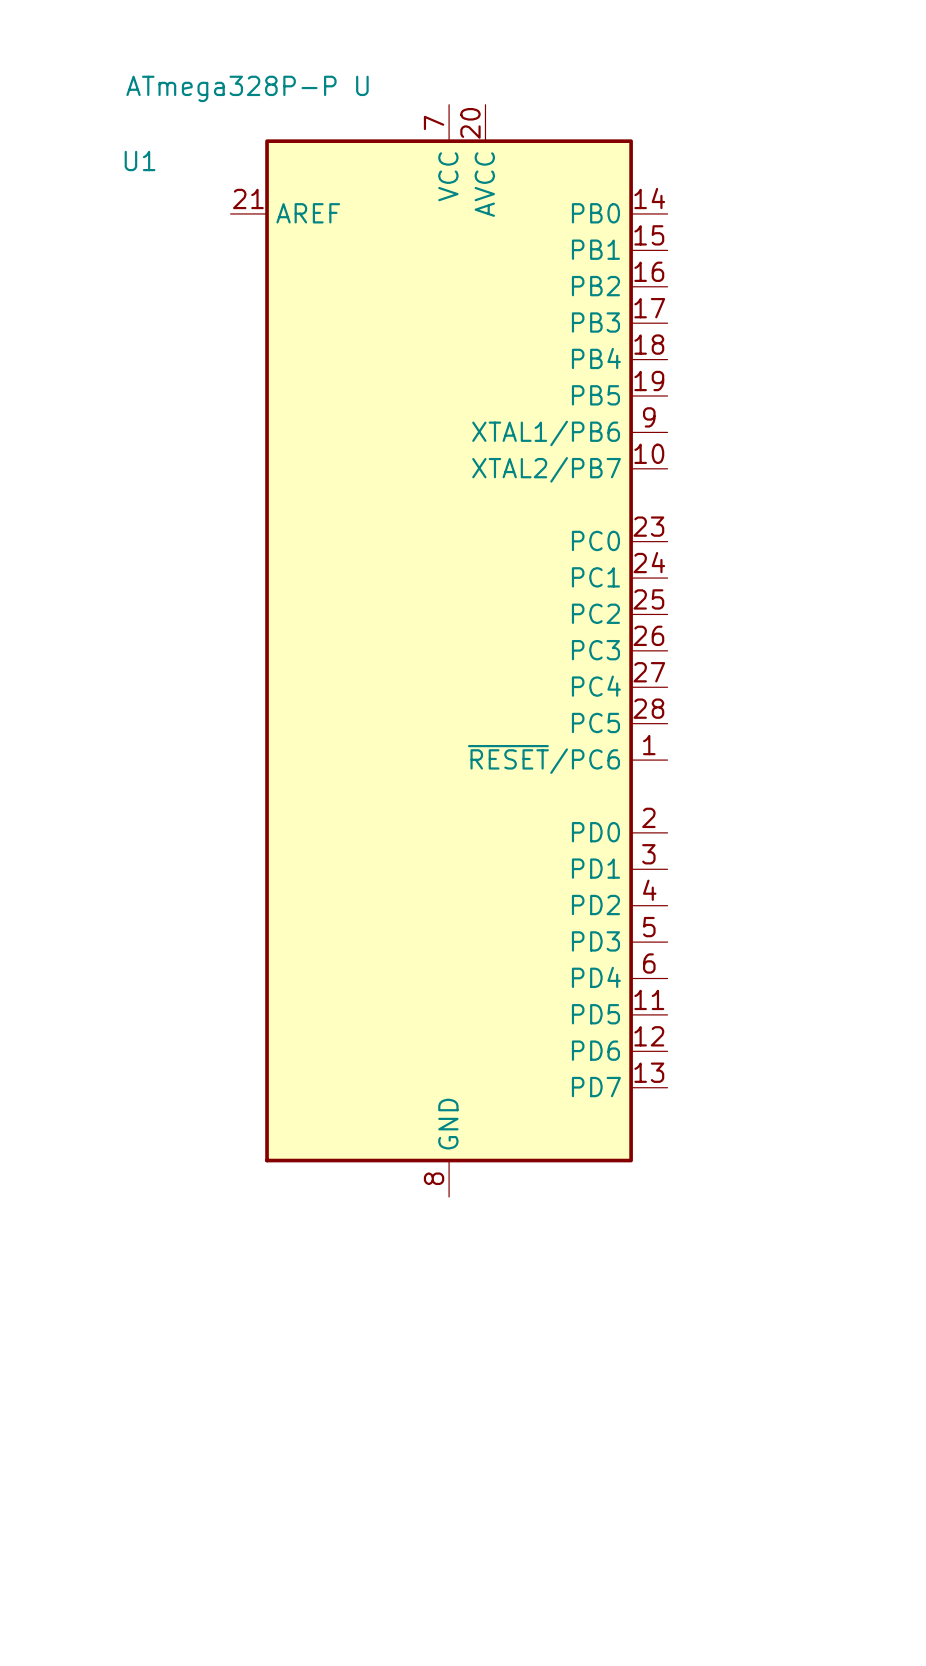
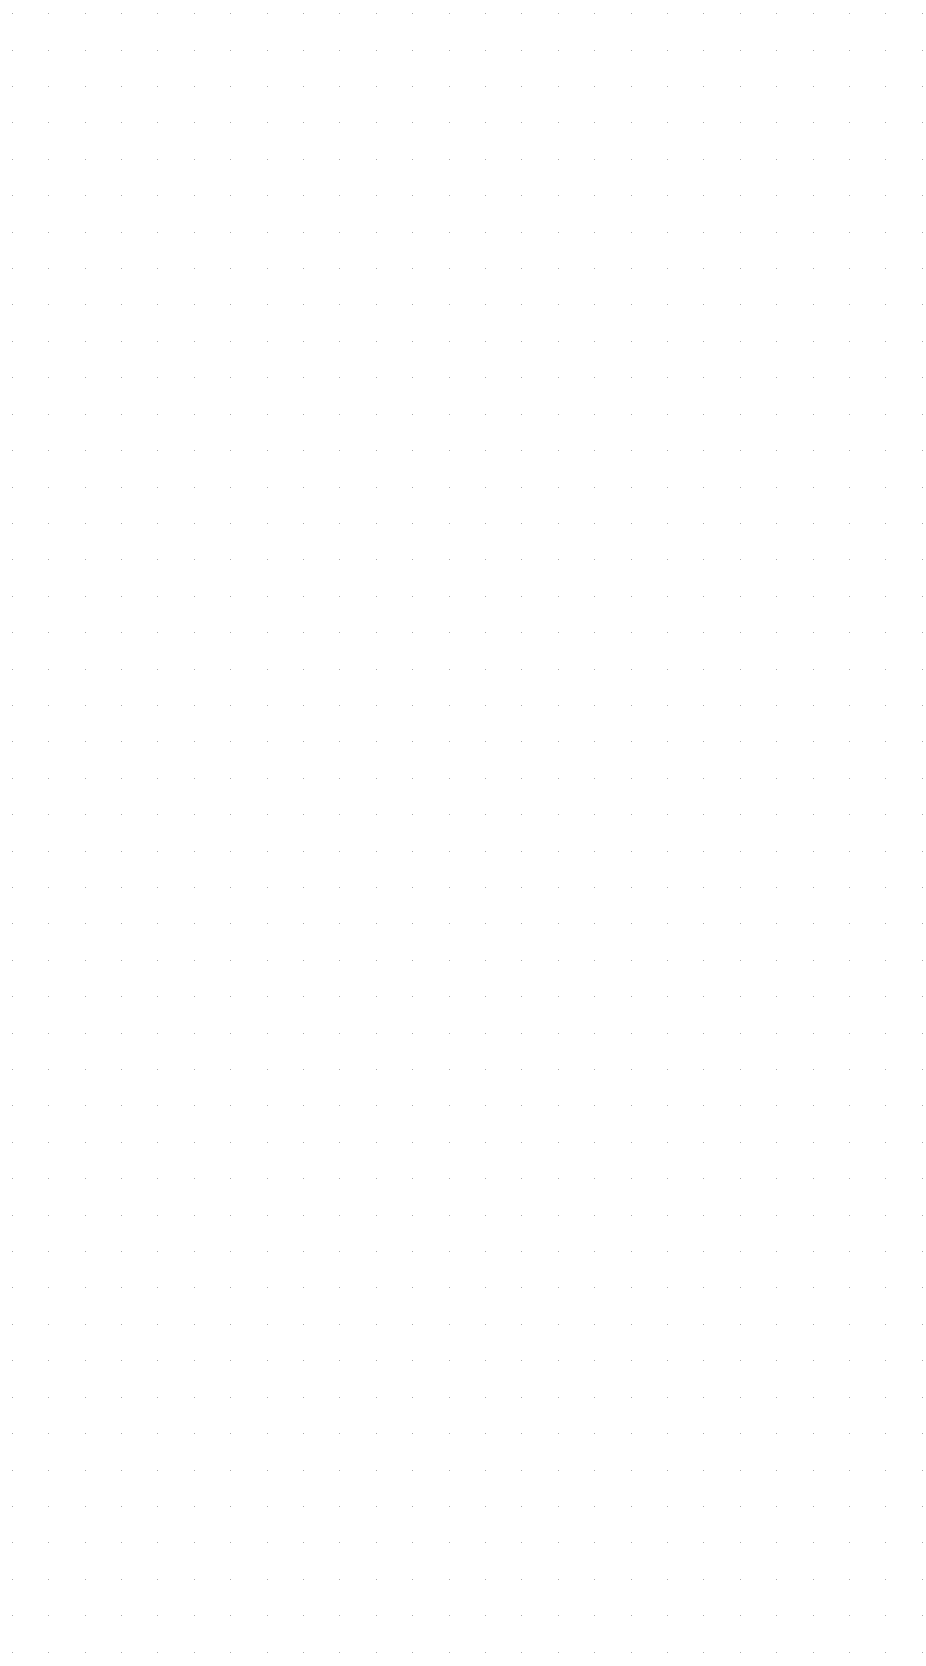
U1: ATmega328P-P U (449, 650) -> none

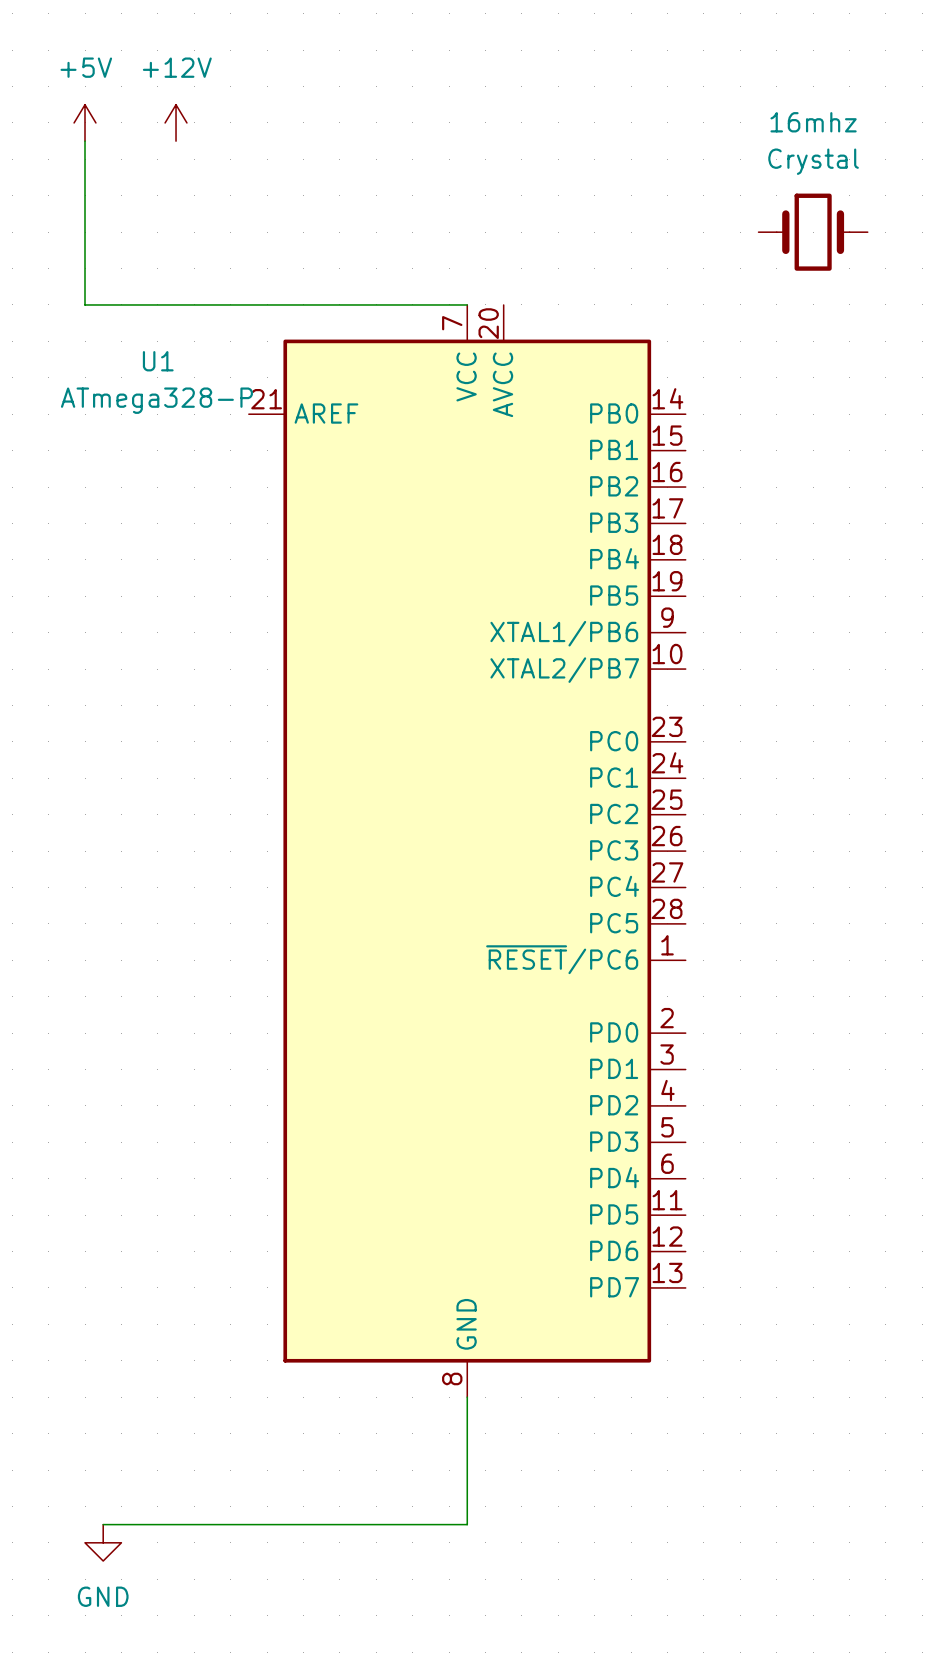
power symbol: none -> +5V (85, 122)
power symbol: none -> +12V (176, 122)
wire: none -> (85, 141) (85, 304) (467, 304)
16mhz: none -> Crystal (813, 232)
U1: none -> ATmega328-P (467, 851)
wire: none -> (467, 1397) (467, 1524) (103, 1524)
power symbol: none -> GND (103, 1542)

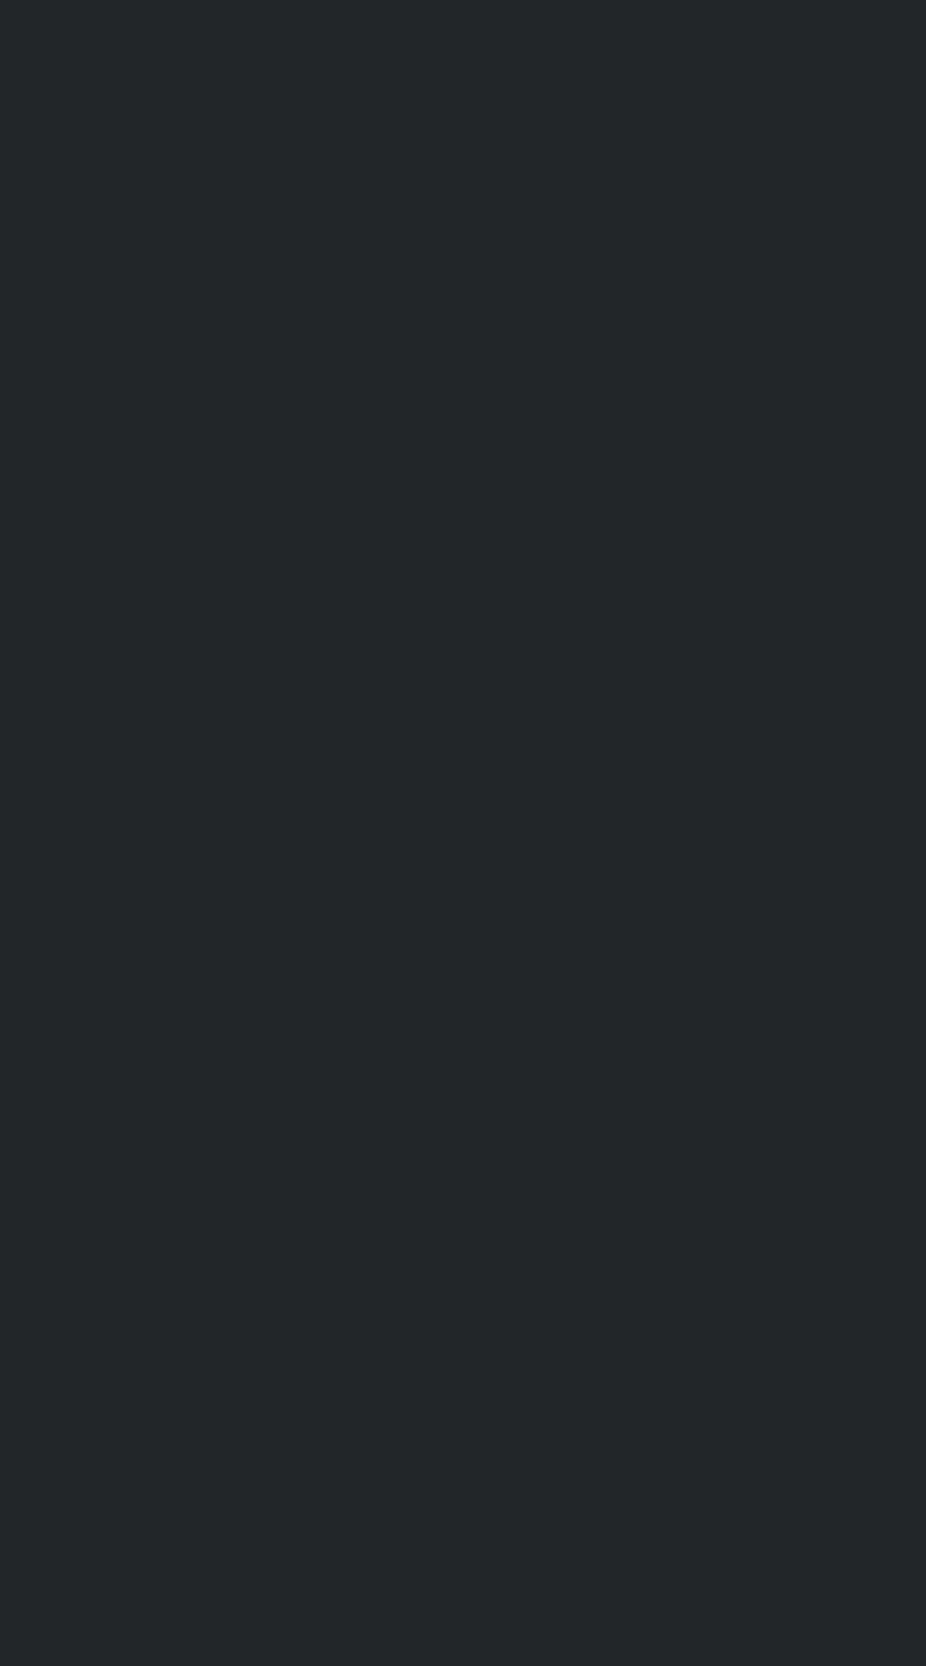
power symbol: +5V (85, 122) -> none
power symbol: +12V (176, 122) -> none
wire: (85, 141) (85, 304) (467, 304) -> none
16mhz: Crystal (813, 232) -> none
U1: ATmega328-P (467, 851) -> none
wire: (467, 1397) (467, 1524) (103, 1524) -> none
power symbol: GND (103, 1542) -> none

